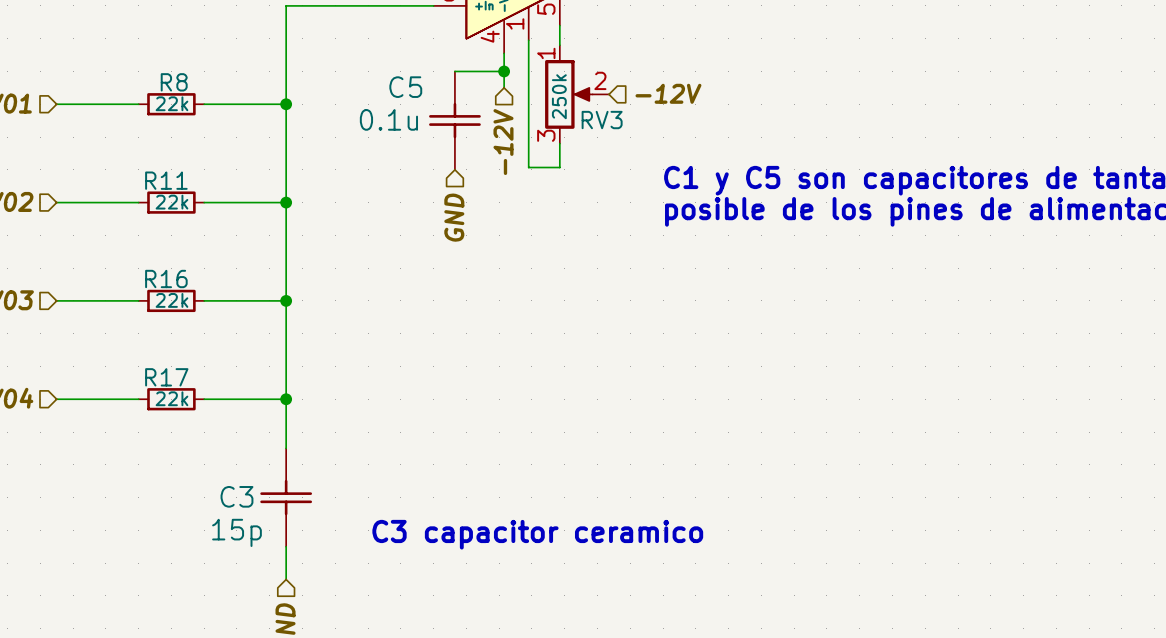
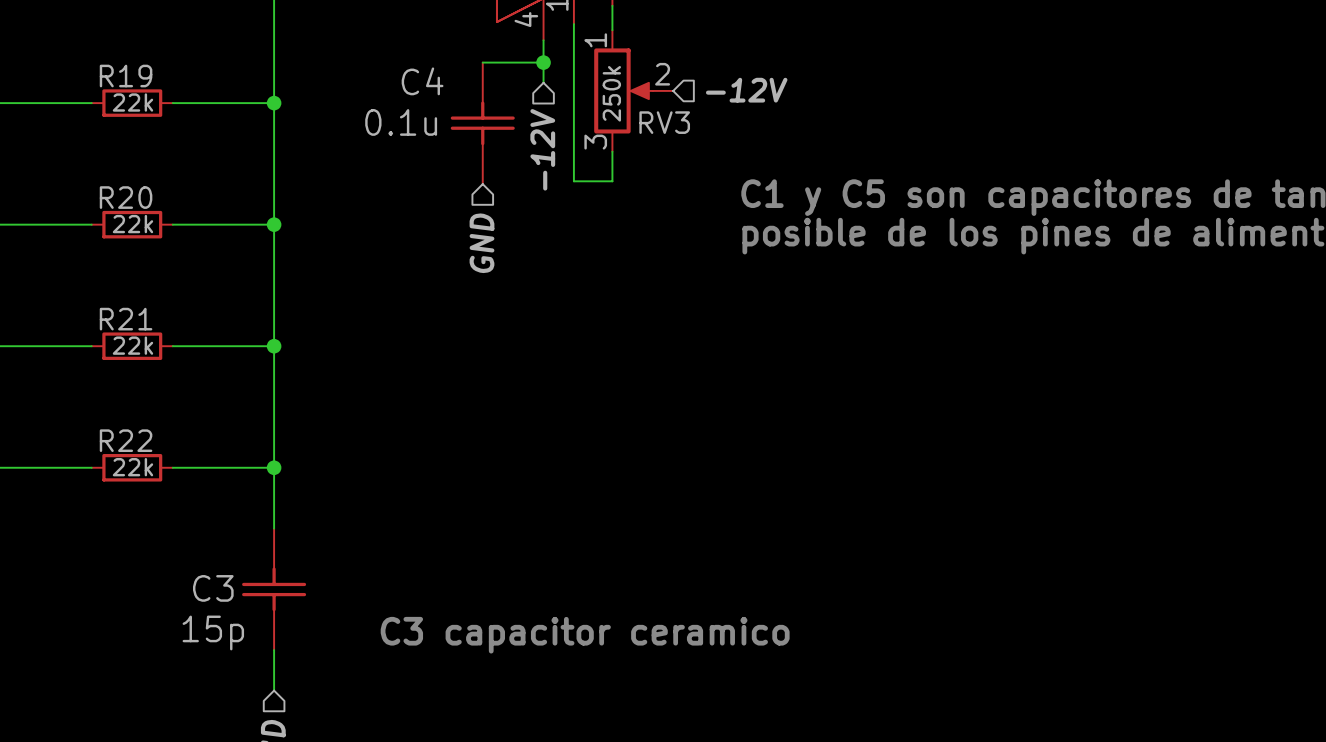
R8 name: R8 (174, 82) -> R19 (126, 76)
C5 name: C5 (405, 87) -> C4 (422, 81)
R11 name: R11 (166, 180) -> R20 (126, 197)
R16 name: R16 (166, 278) -> R21 (126, 319)
R17 name: R17 (166, 377) -> R22 (126, 440)

